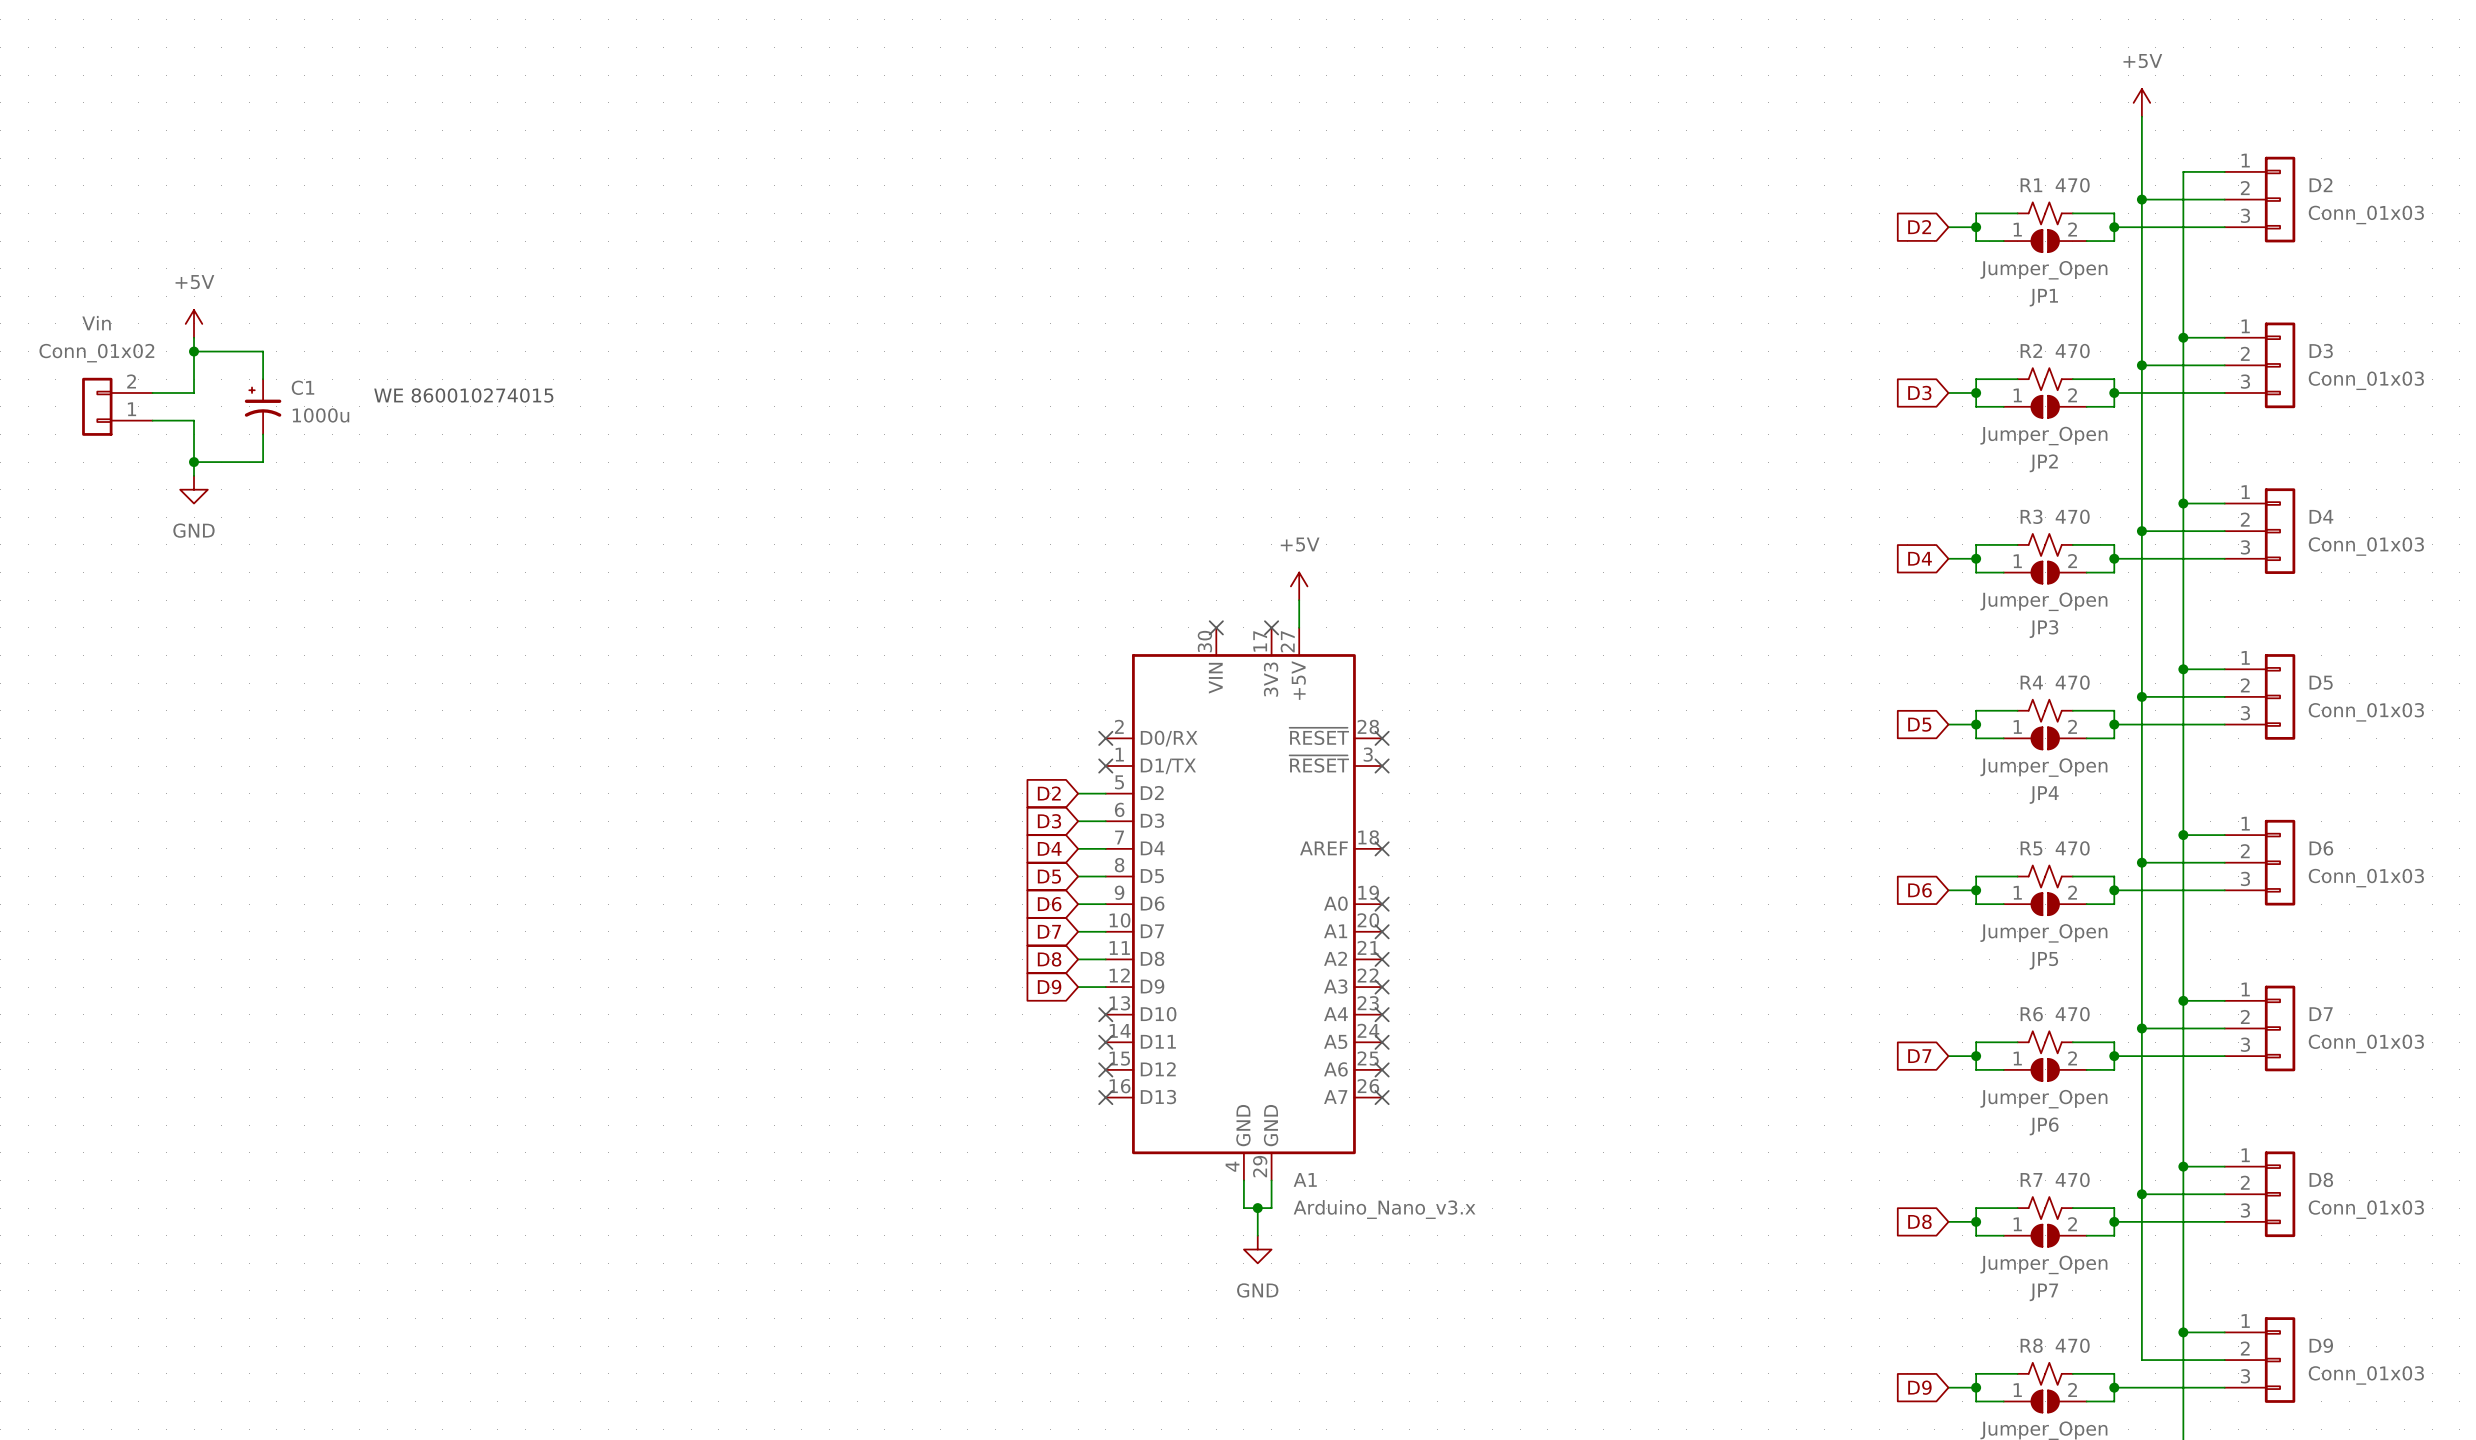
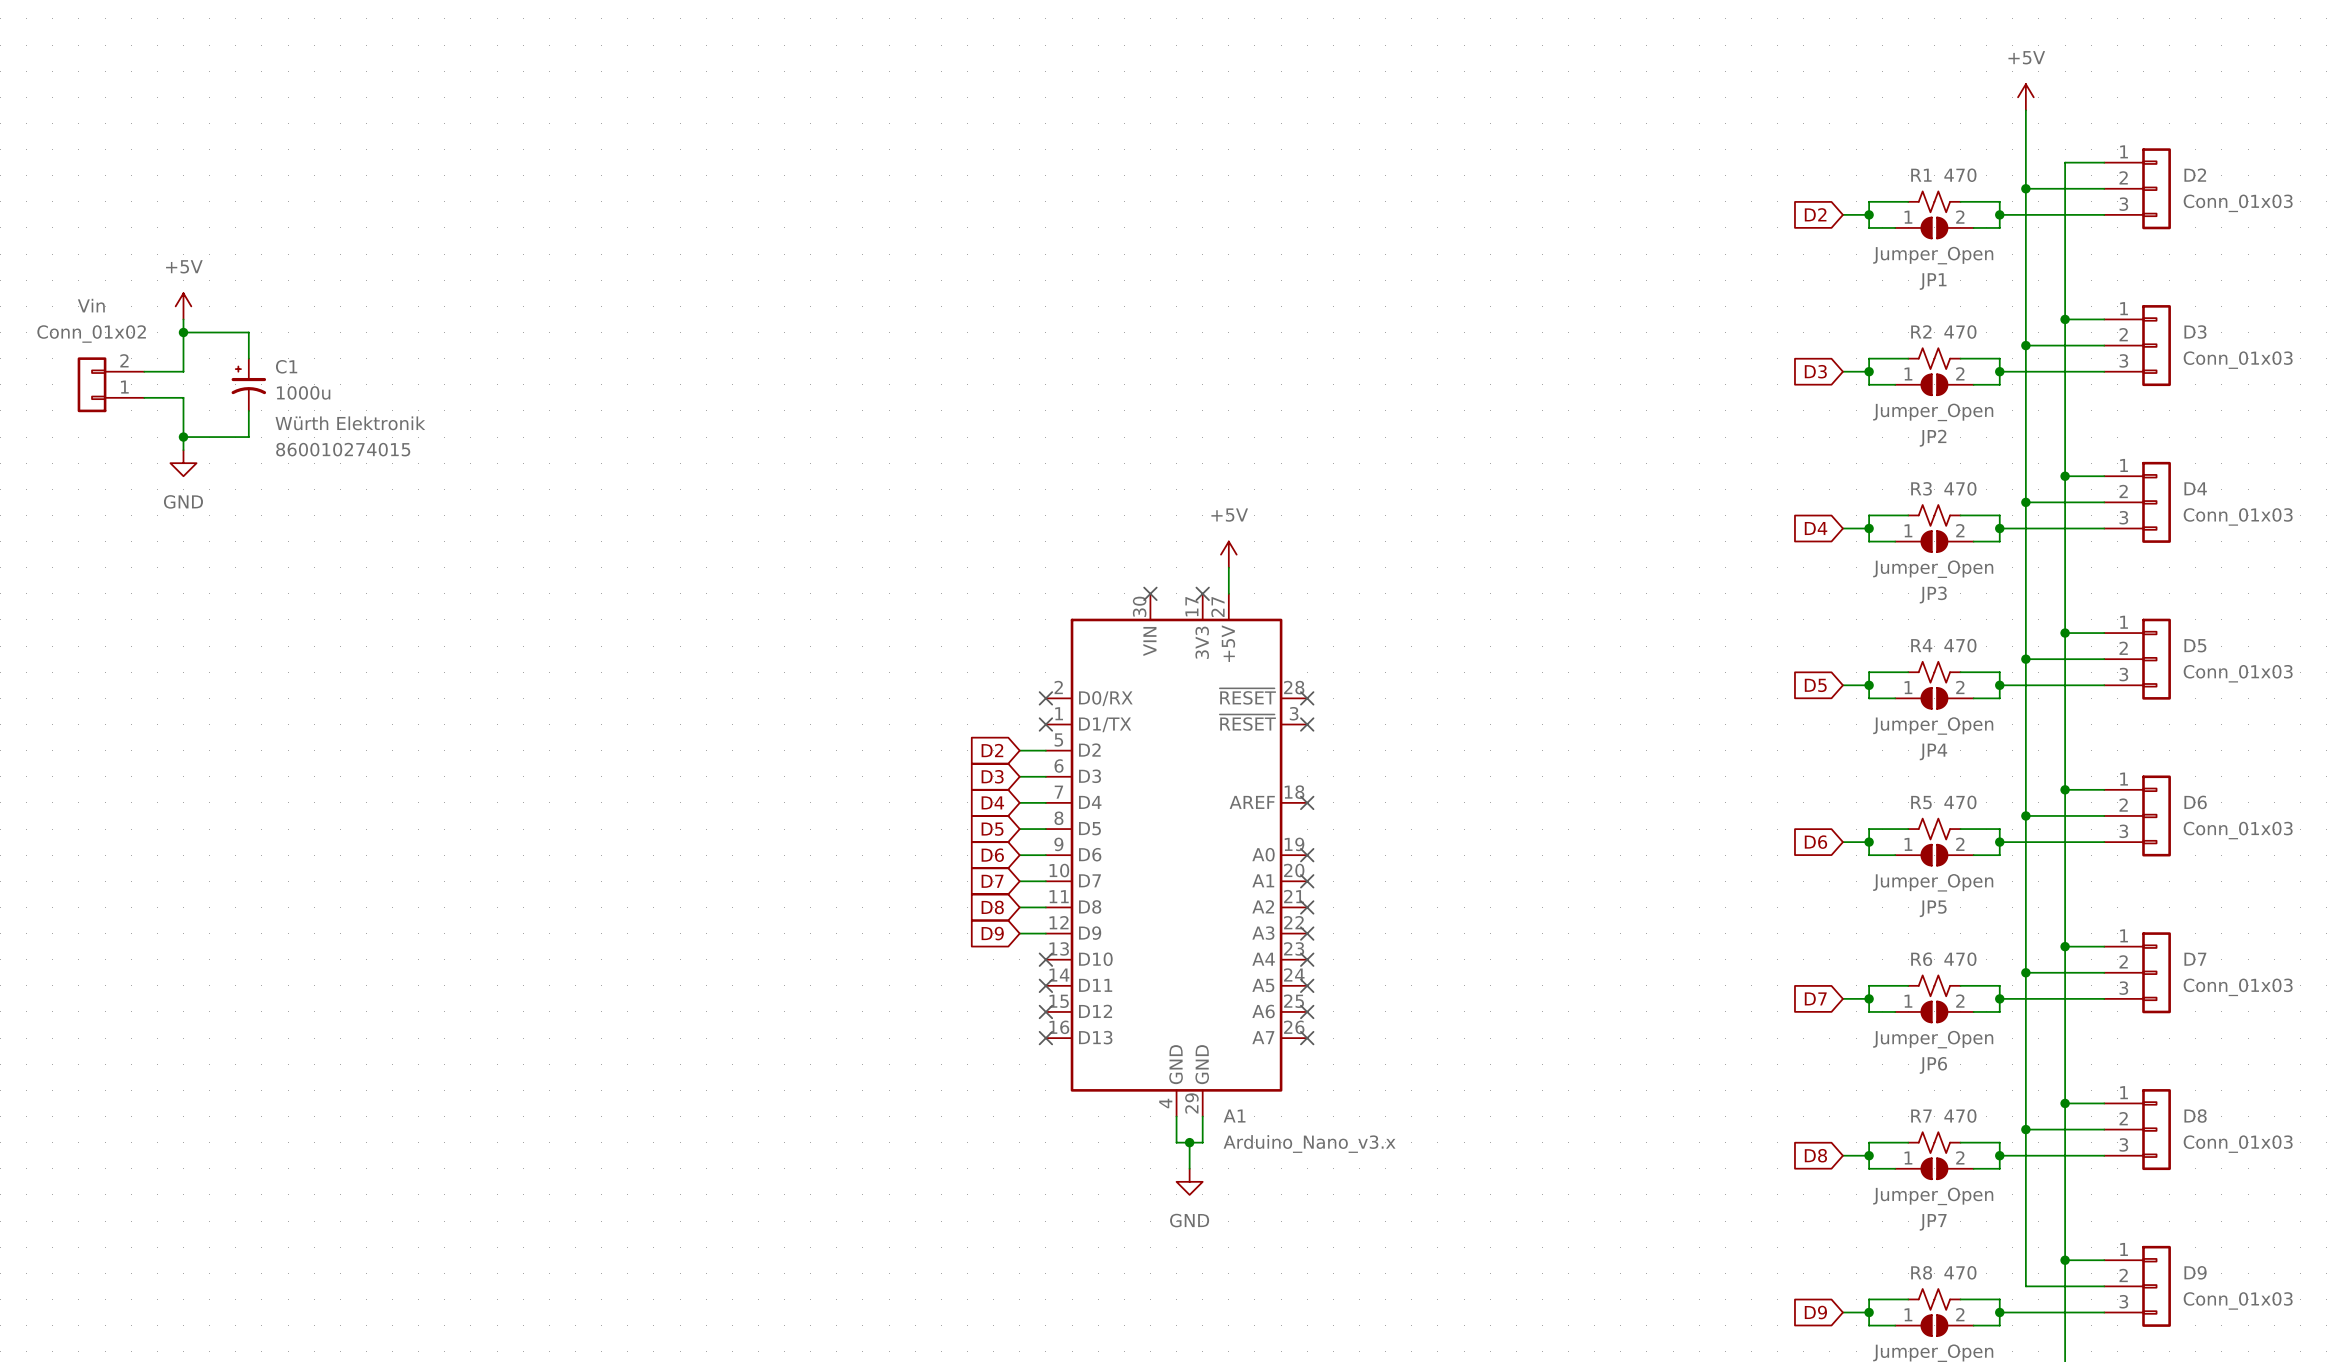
text: WE 860010274015 (463, 395) -> none
C1 text: none -> Würth Elektronik (350, 423)
C1 text: none -> 860010274015 (343, 449)

